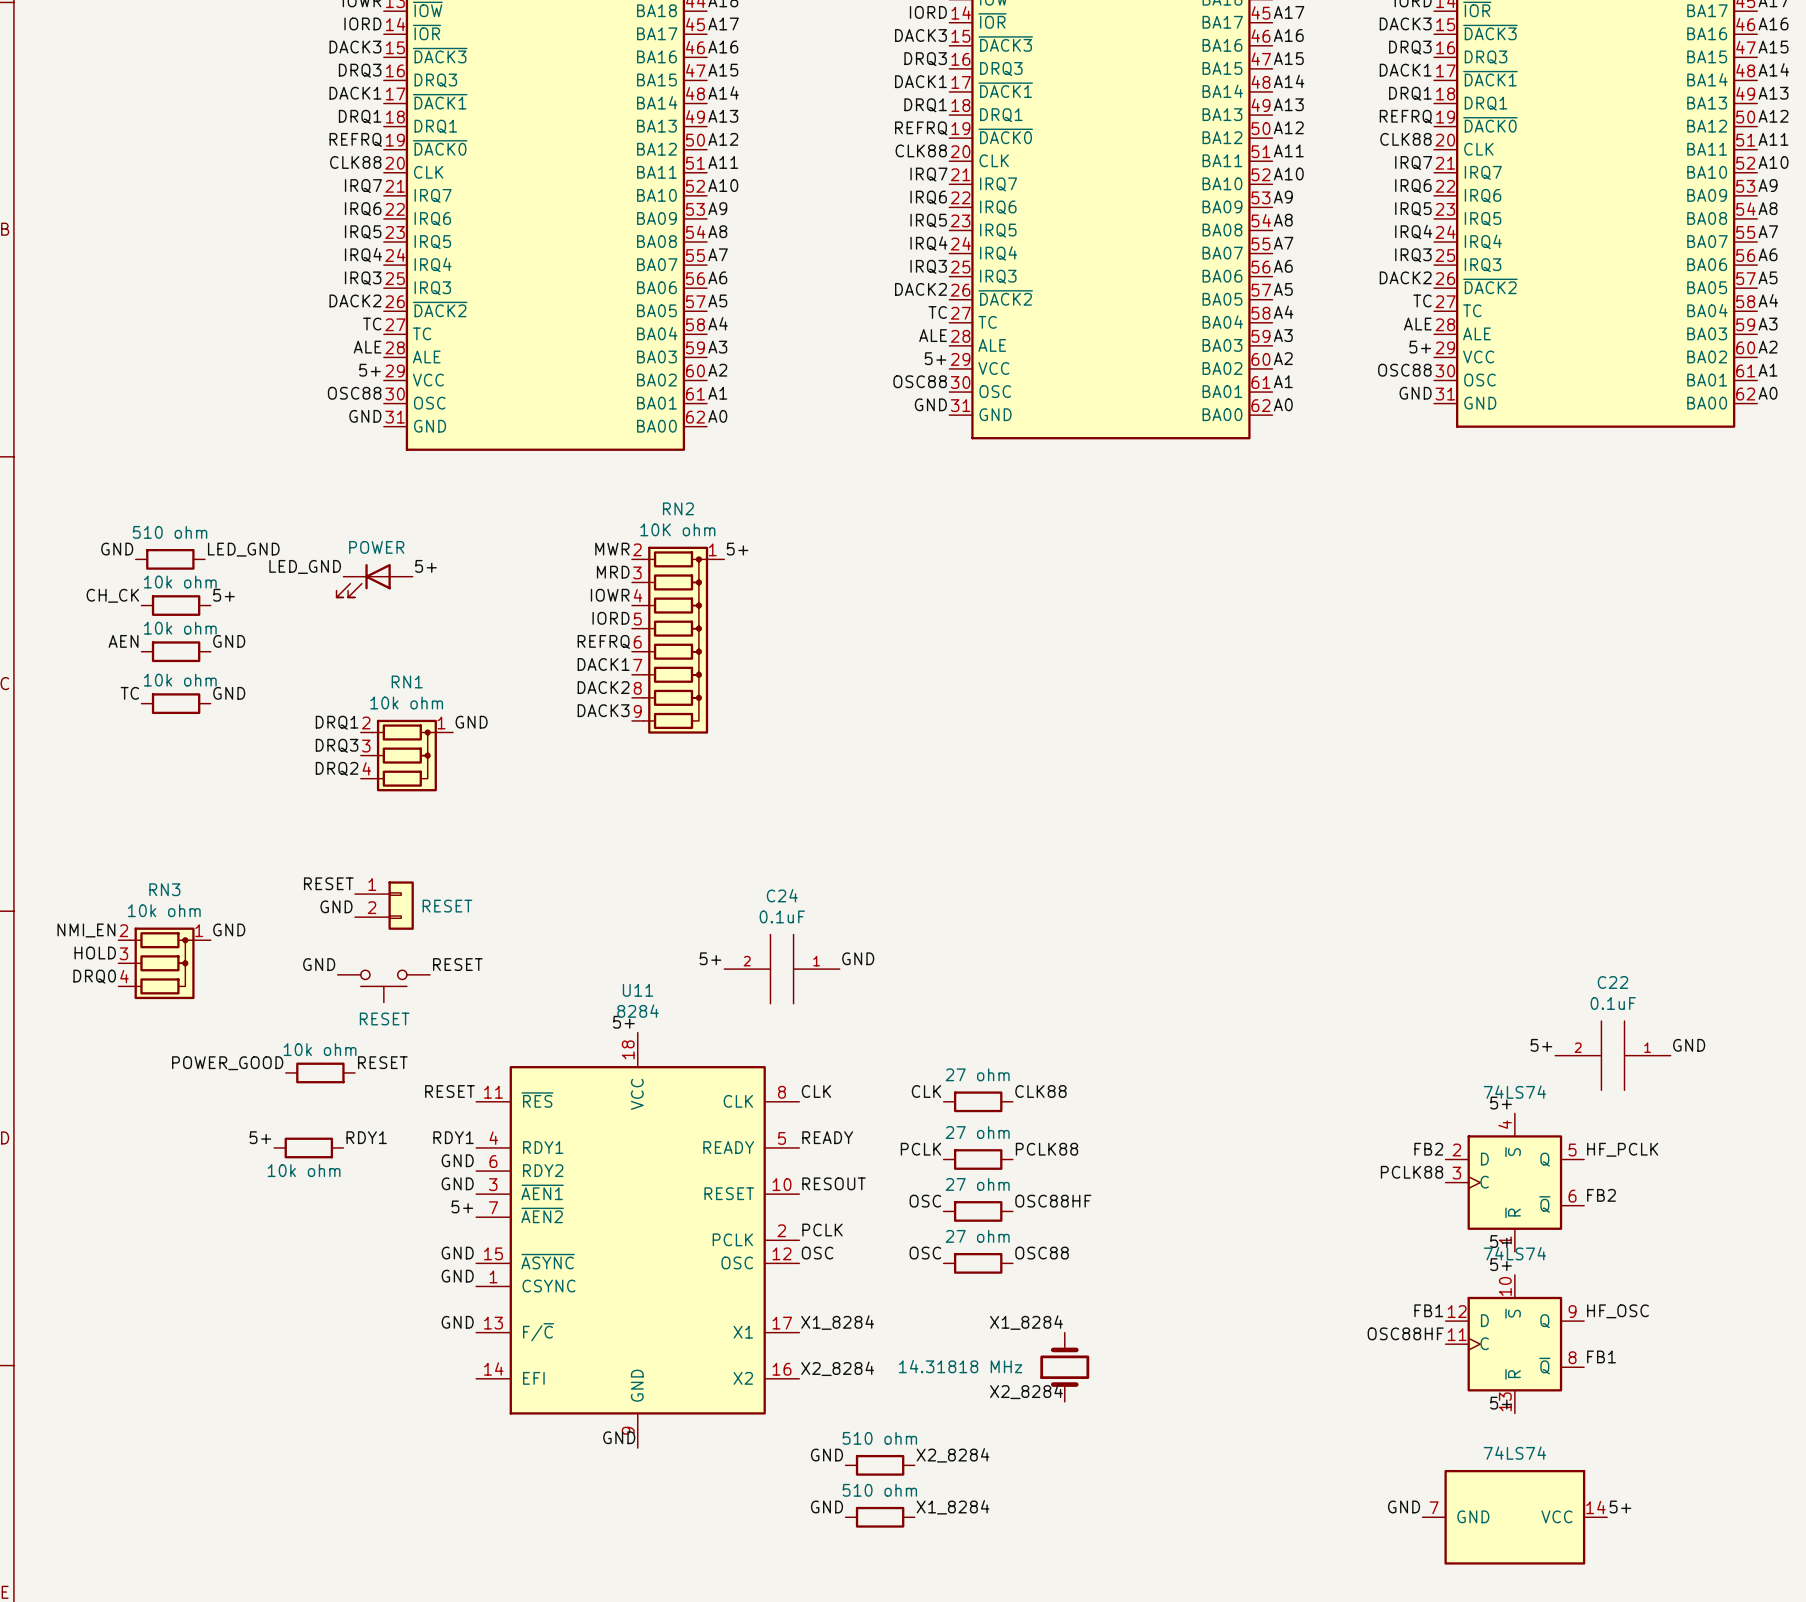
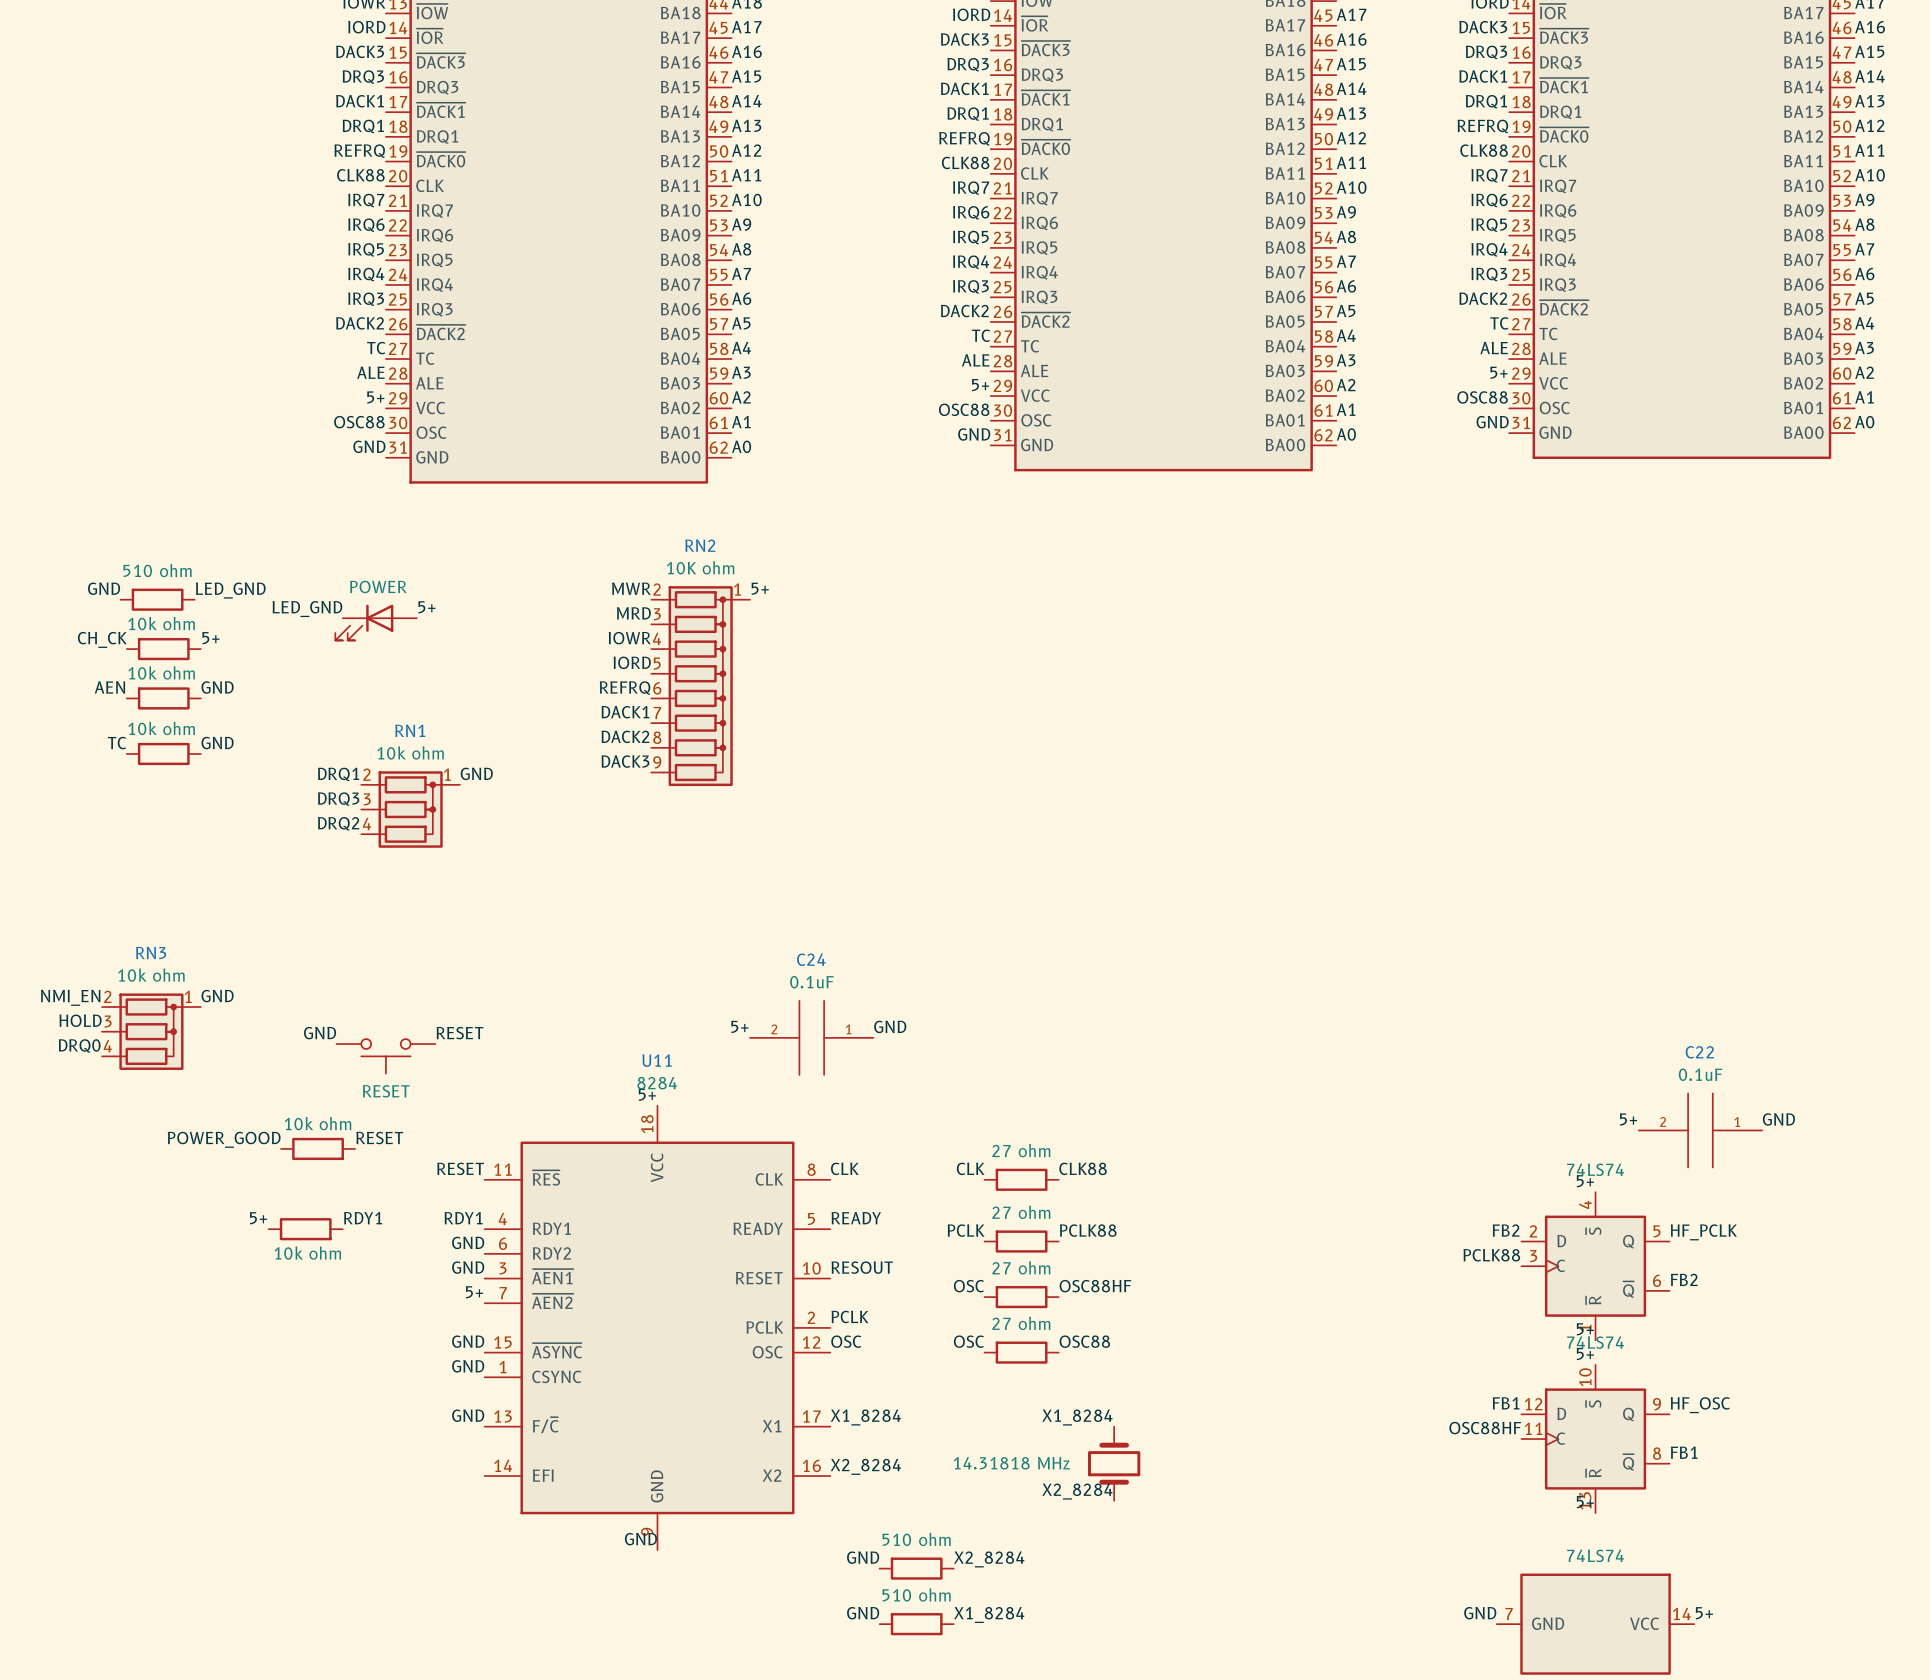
label: RESET (328, 883) -> none
part: RESET (384, 905) -> none
label: GND (336, 906) -> none

